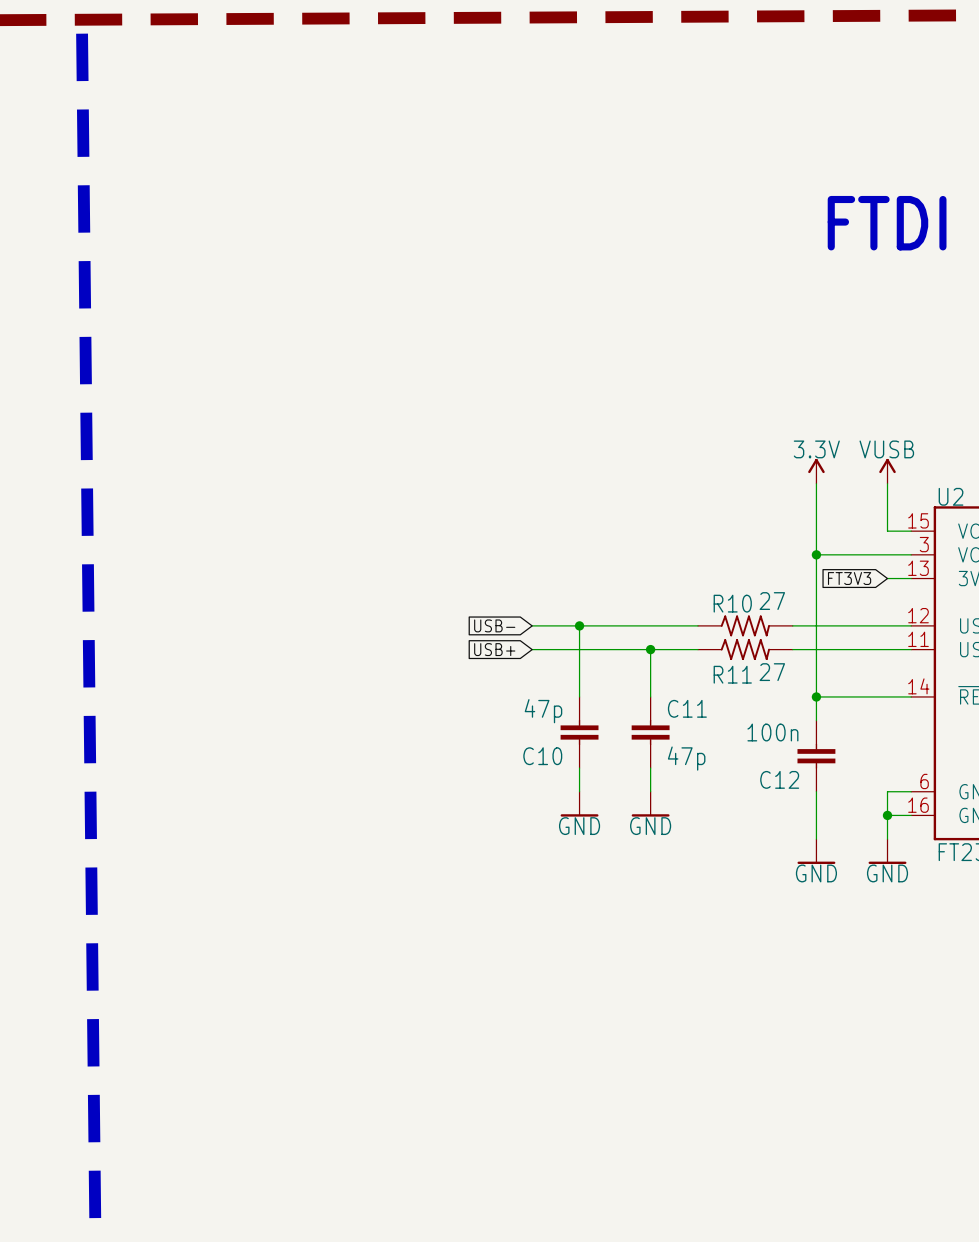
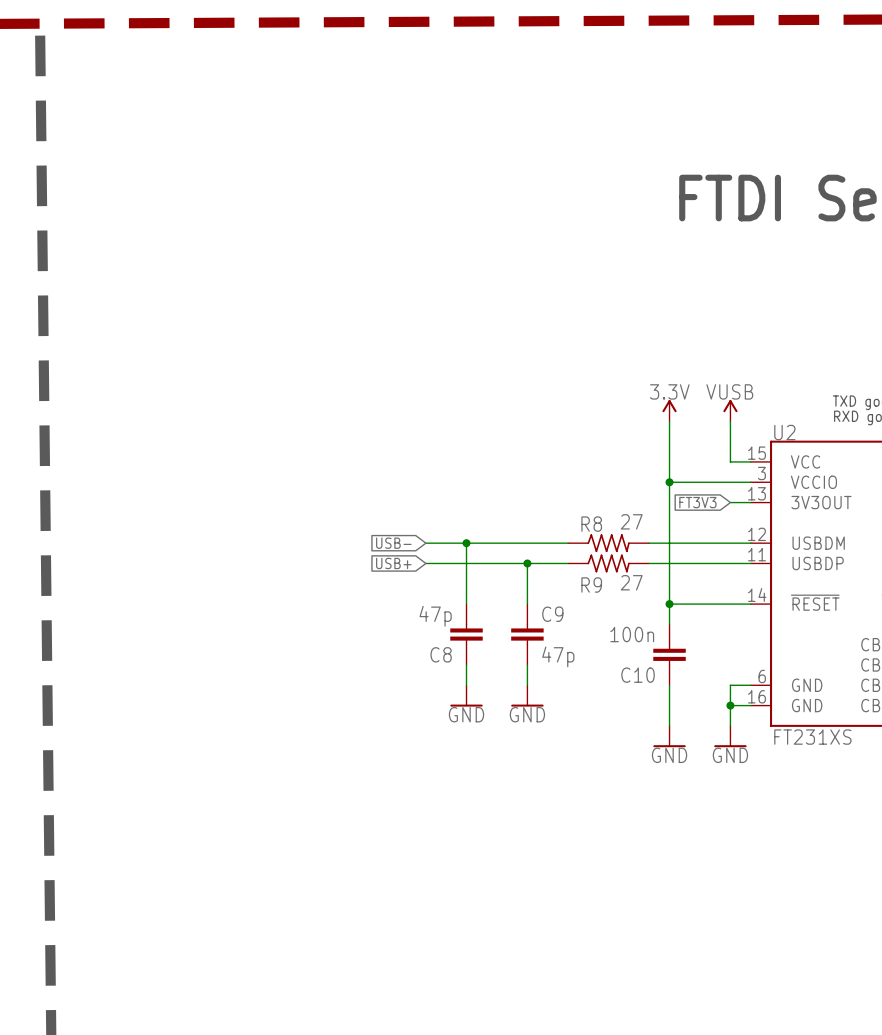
R10 name: R10 (732, 603) -> R8 (591, 524)
R11 name: R11 (732, 674) -> R9 (591, 584)
C11 name: C11 (687, 708) -> C9 (552, 614)
C10 name: C10 (542, 756) -> C8 (441, 654)
C12 name: C12 (779, 779) -> C10 (638, 675)

